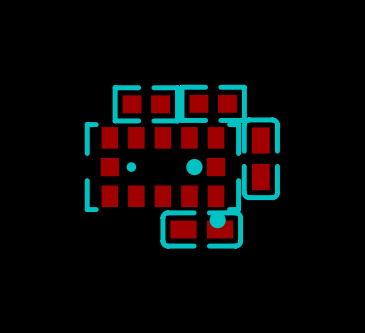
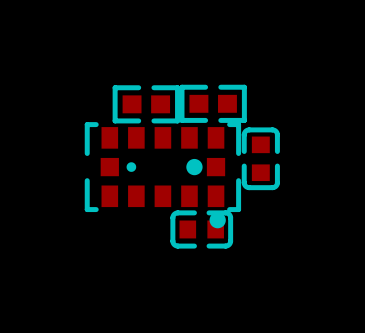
part footprint: [241, 117, 280, 201] -> [241, 127, 280, 191]
part footprint: [160, 210, 244, 249] -> [170, 210, 234, 249]

